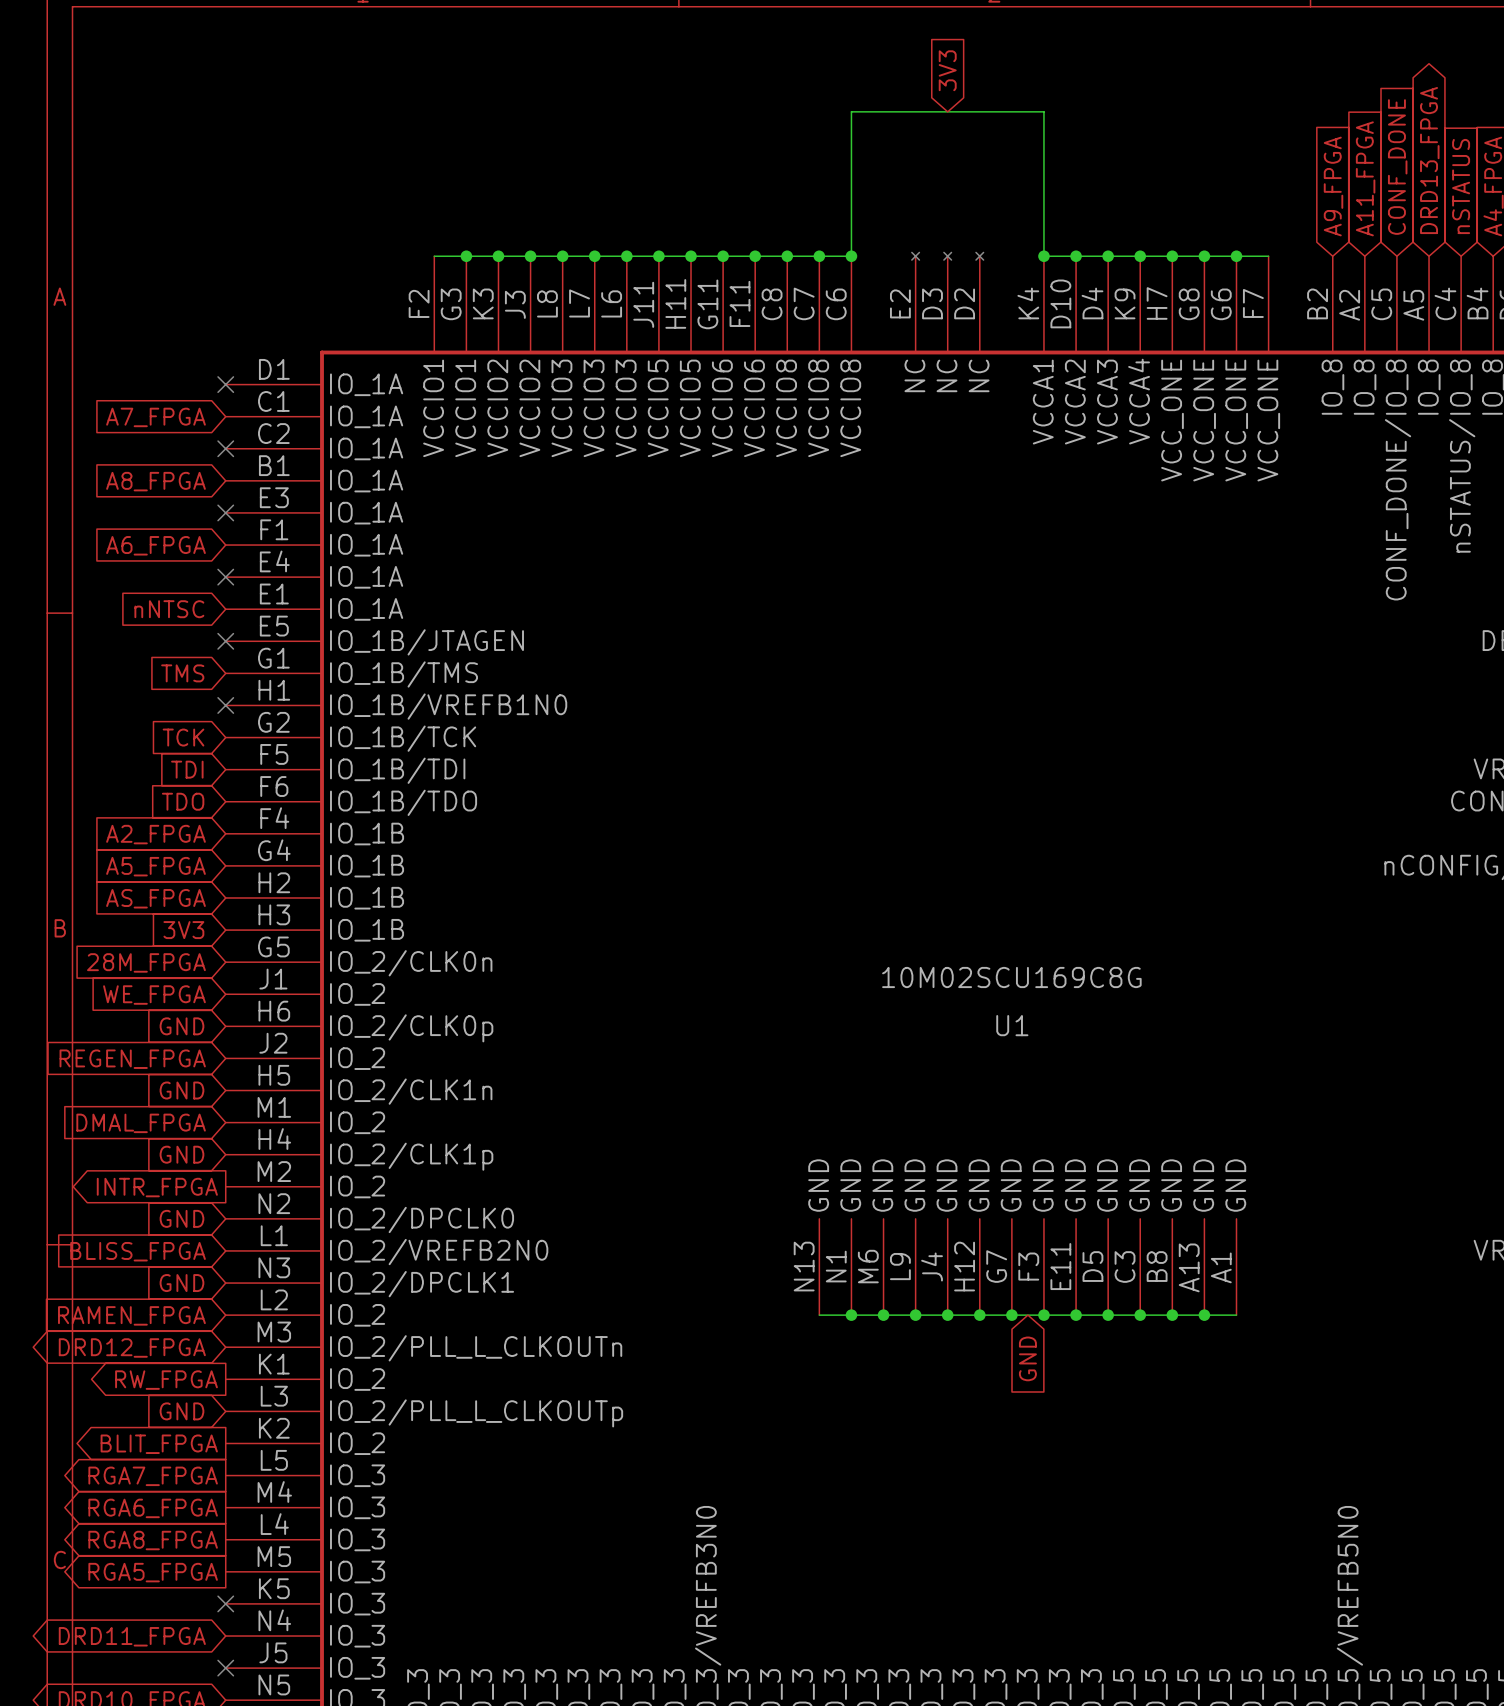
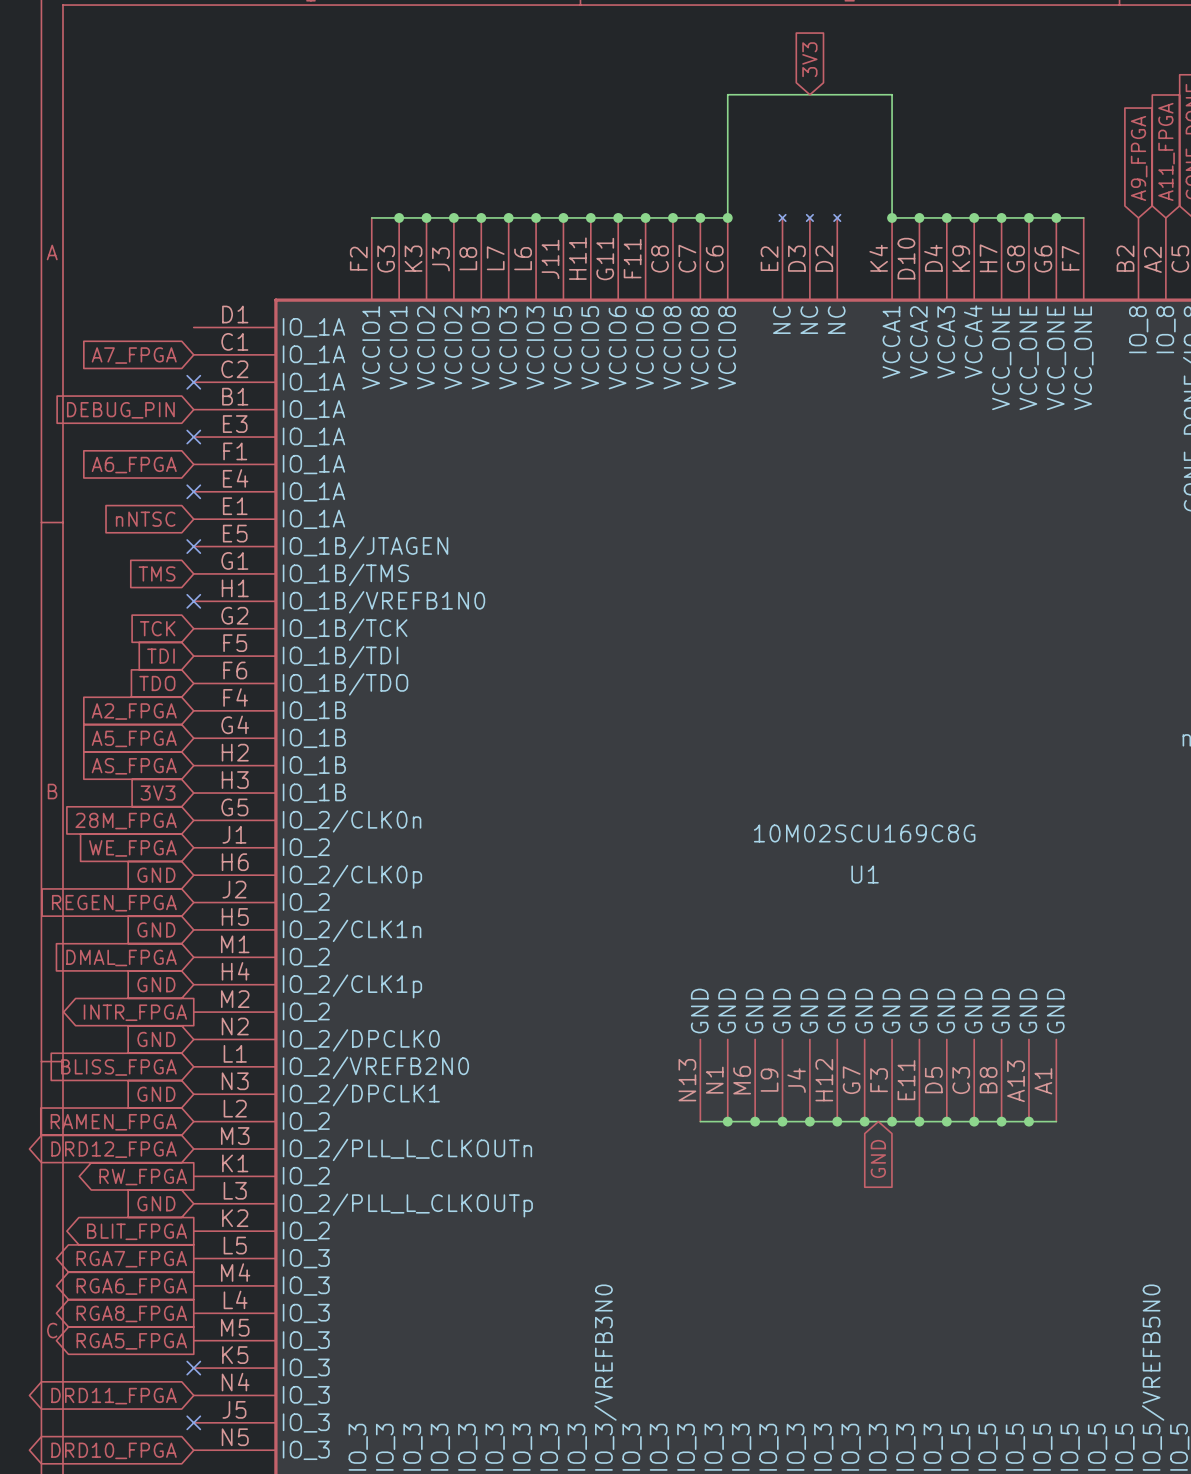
no-connect mark: (225, 384) -> none
global label: A8_FPGA (156, 481) -> DEBUG_PIN (120, 410)

